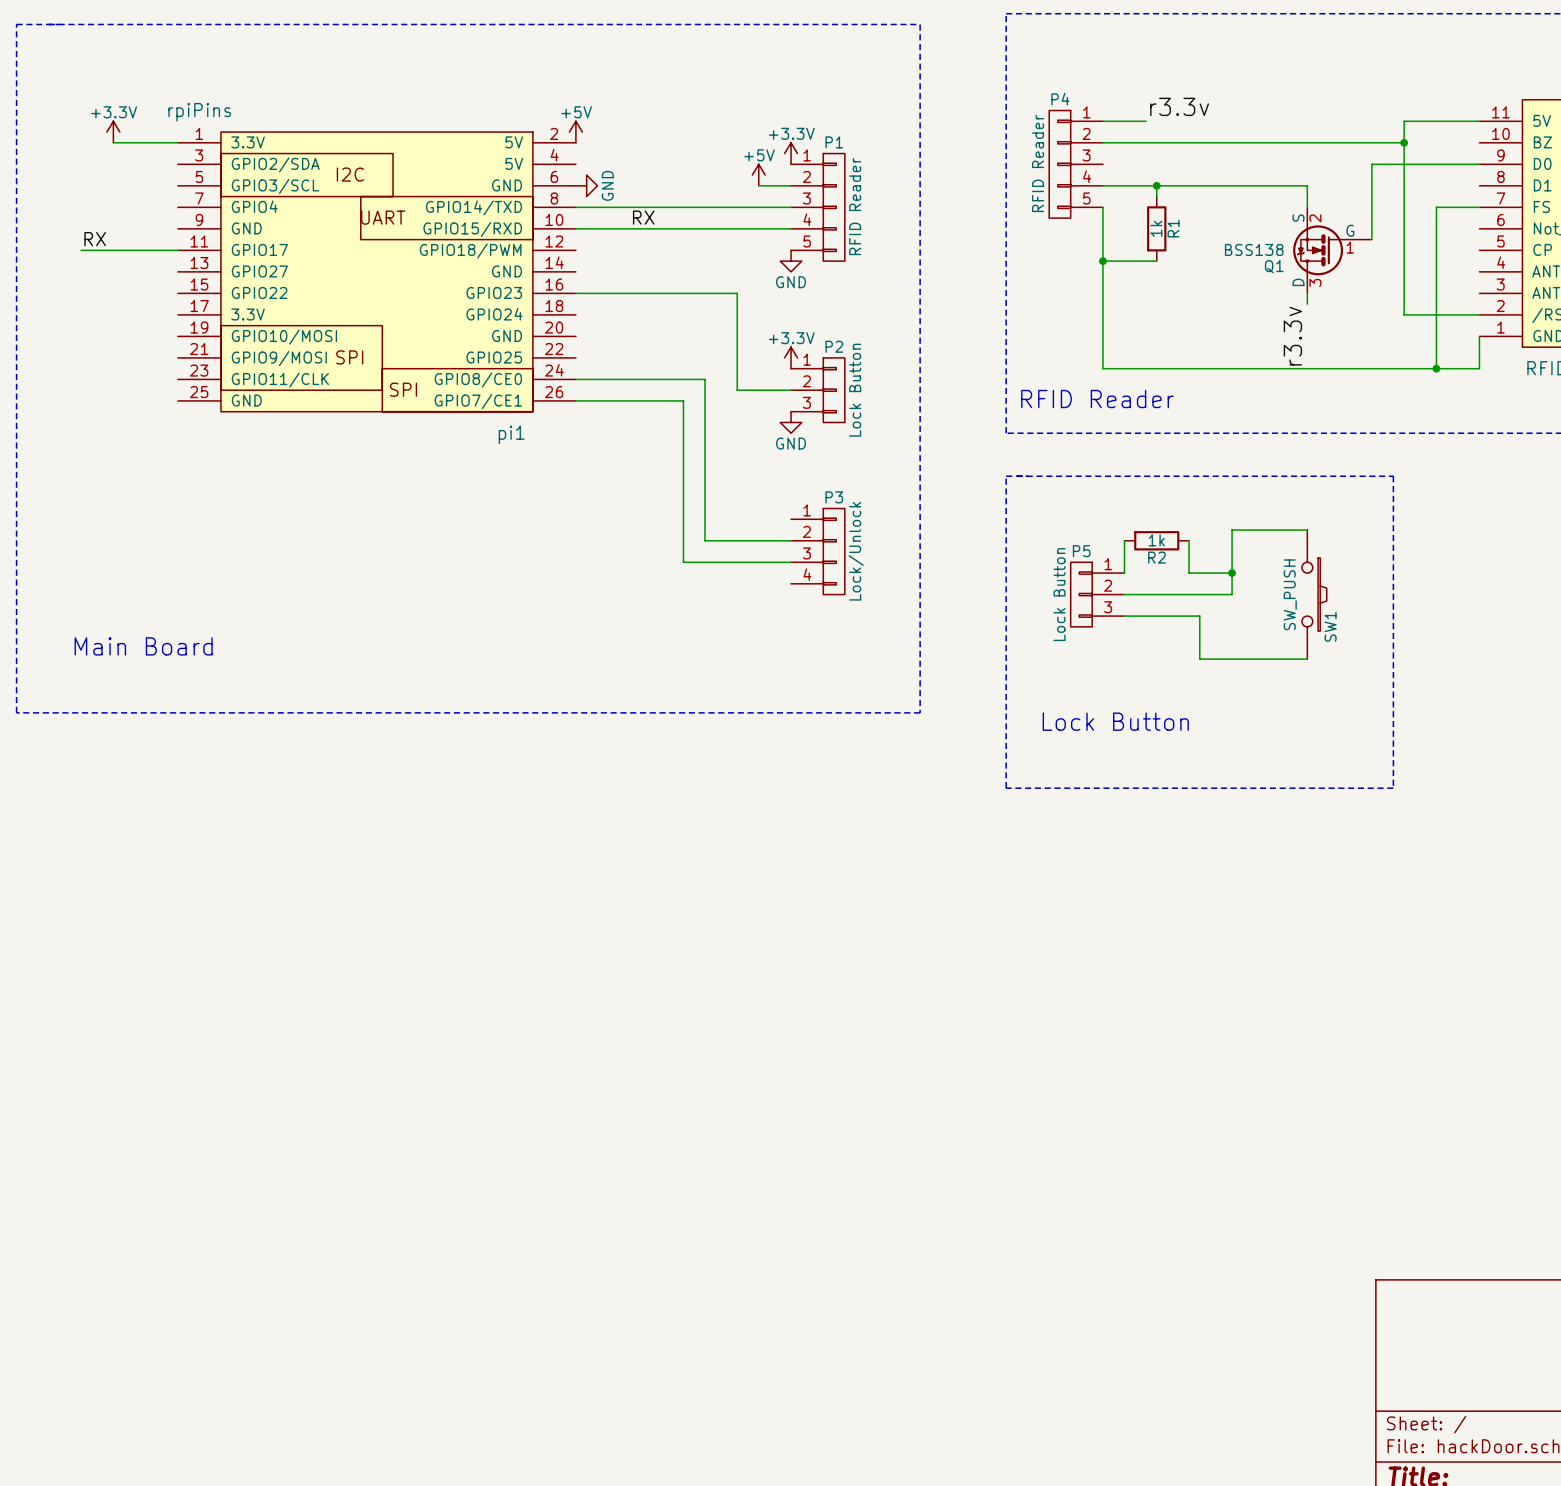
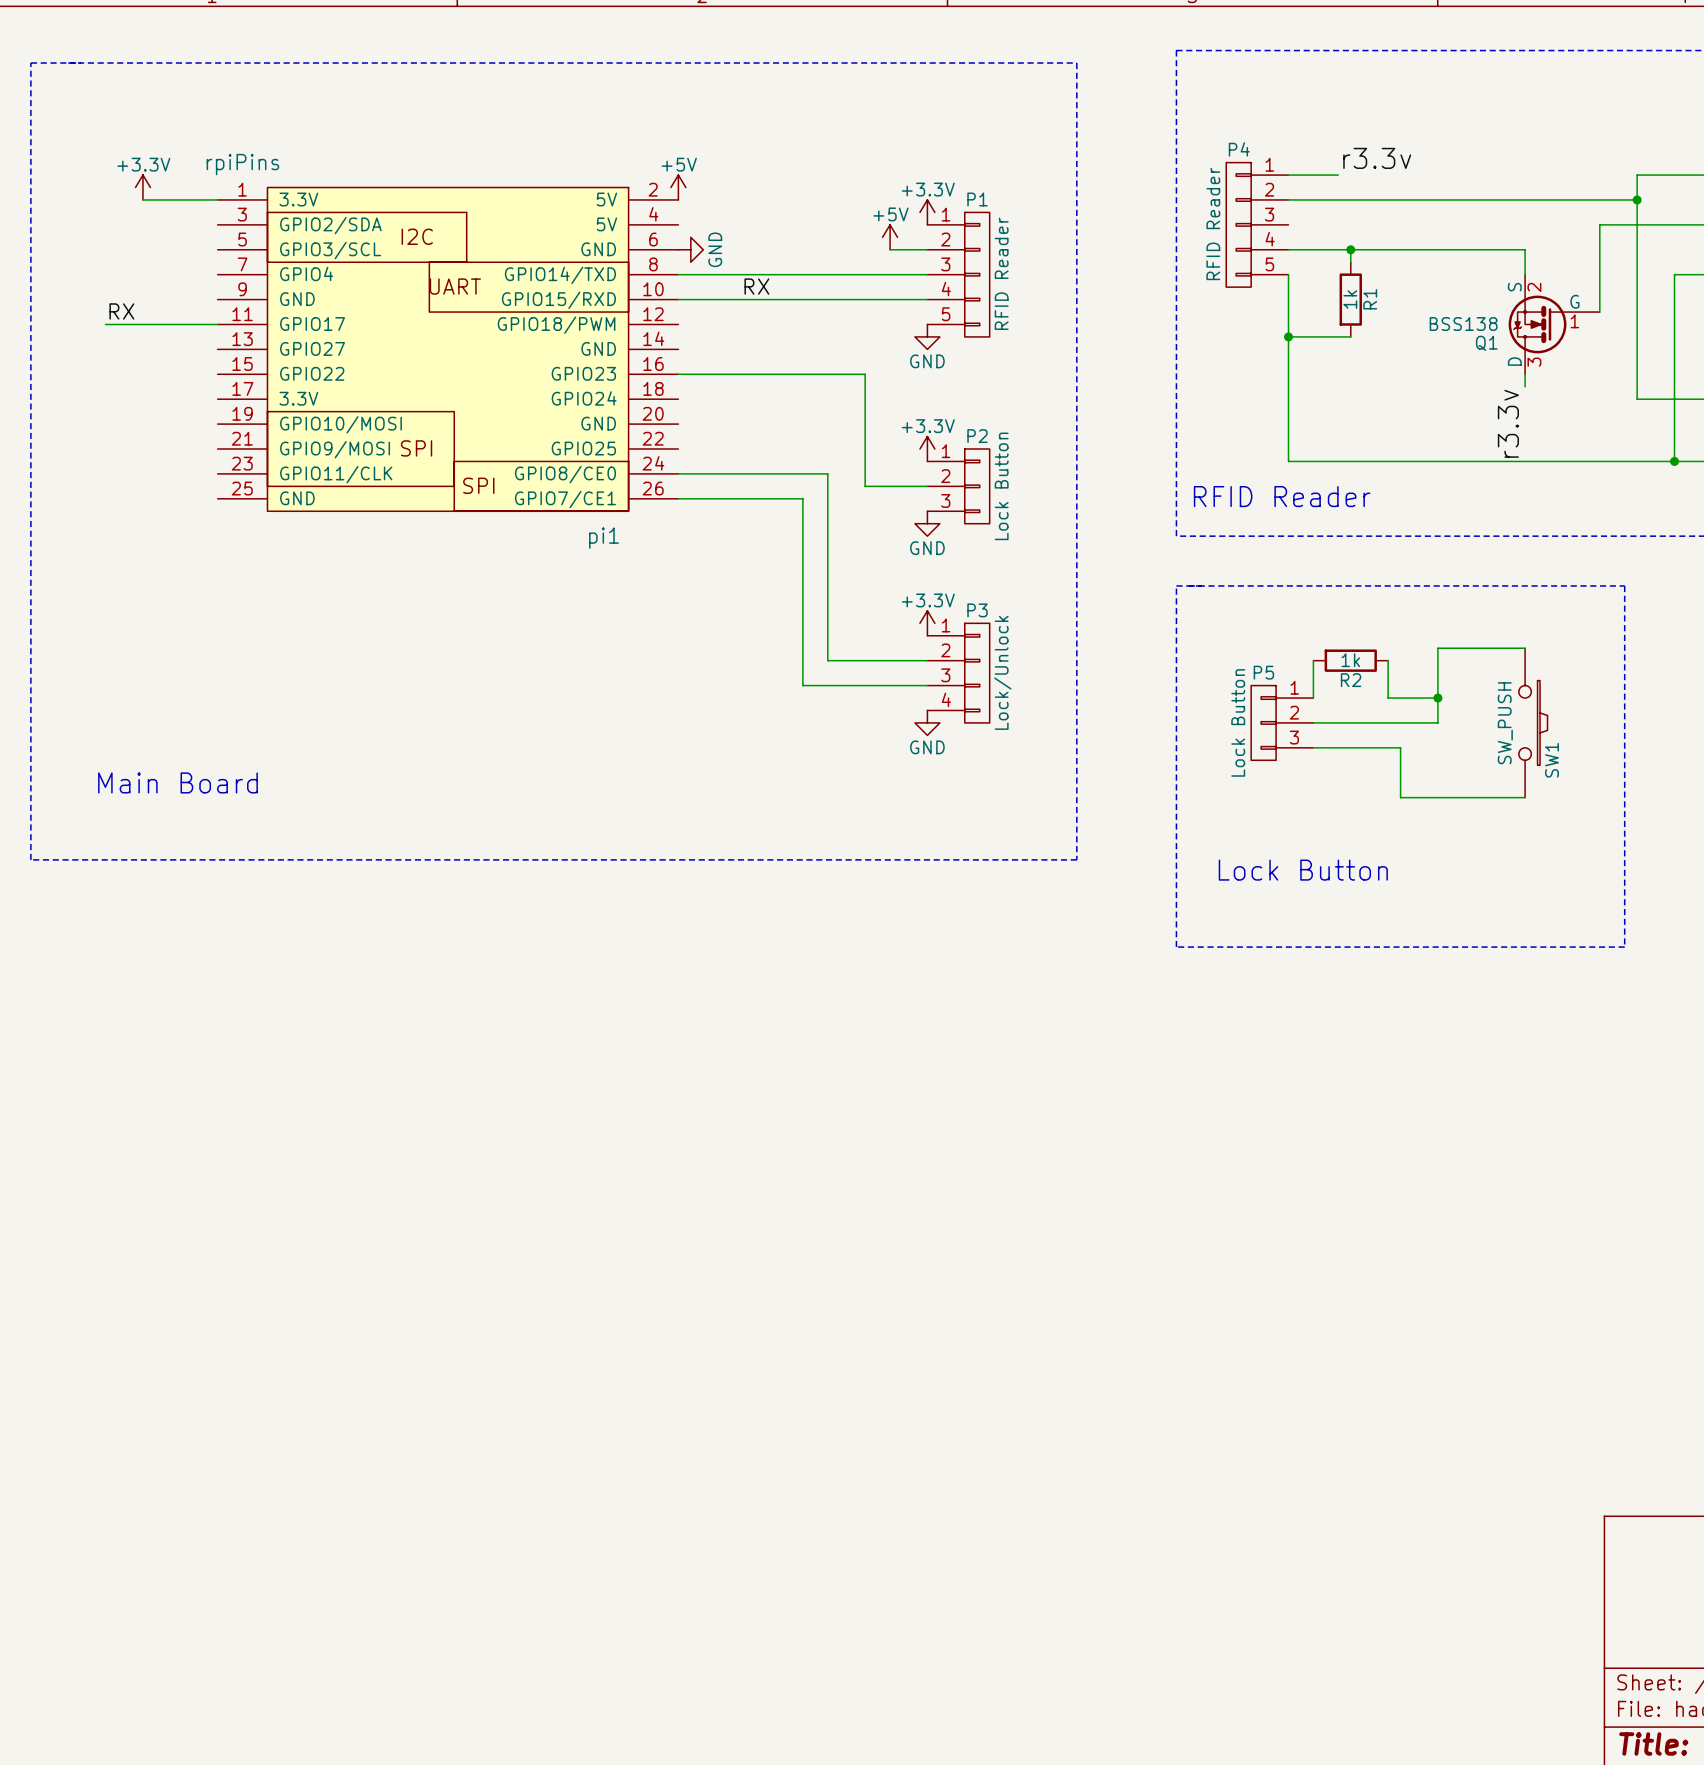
power symbol: none -> +3.3V (927, 623)
power symbol: none -> GND (927, 722)

